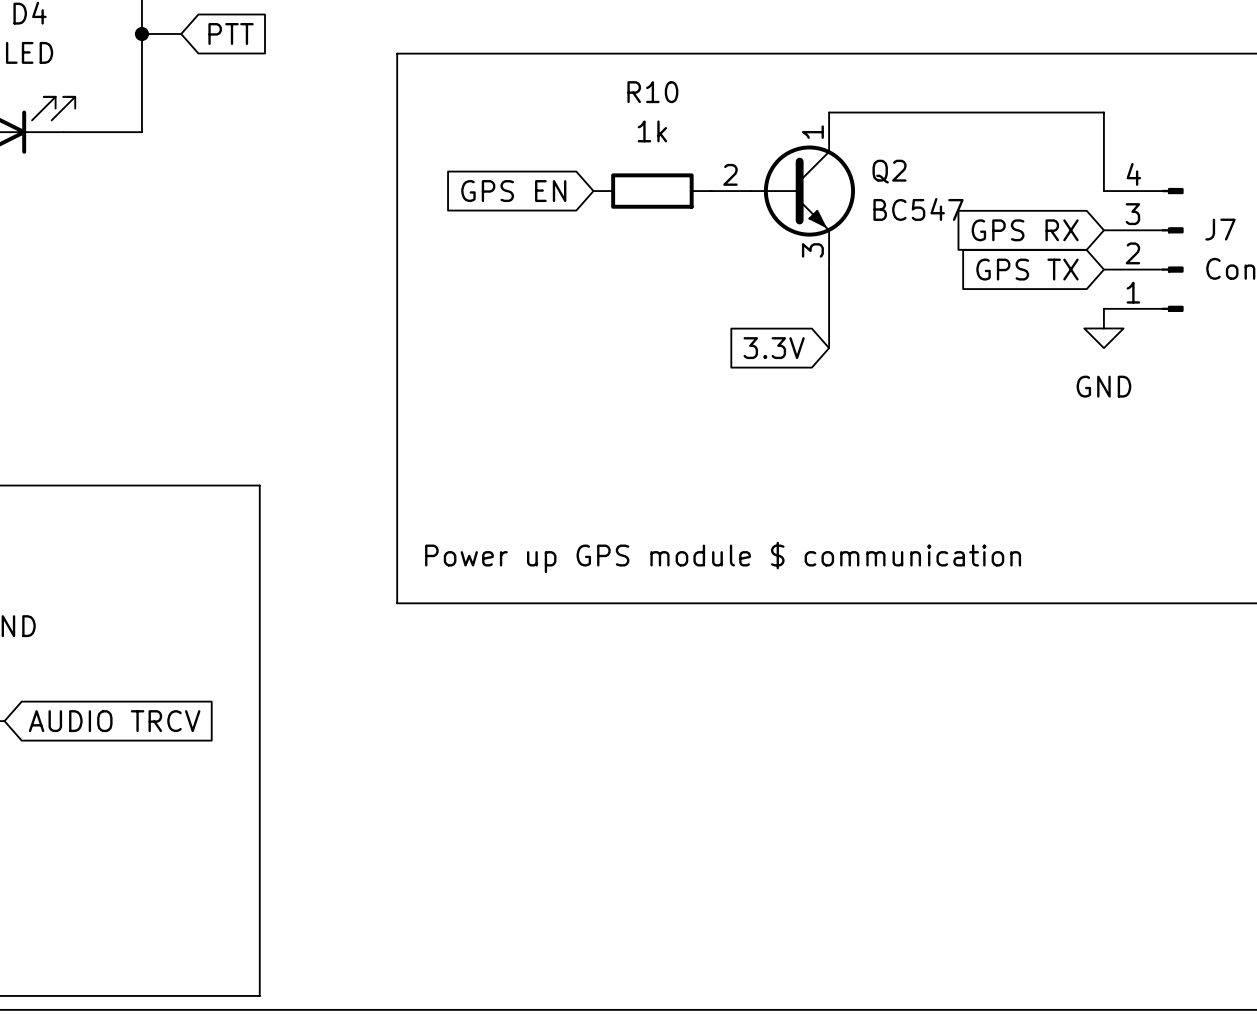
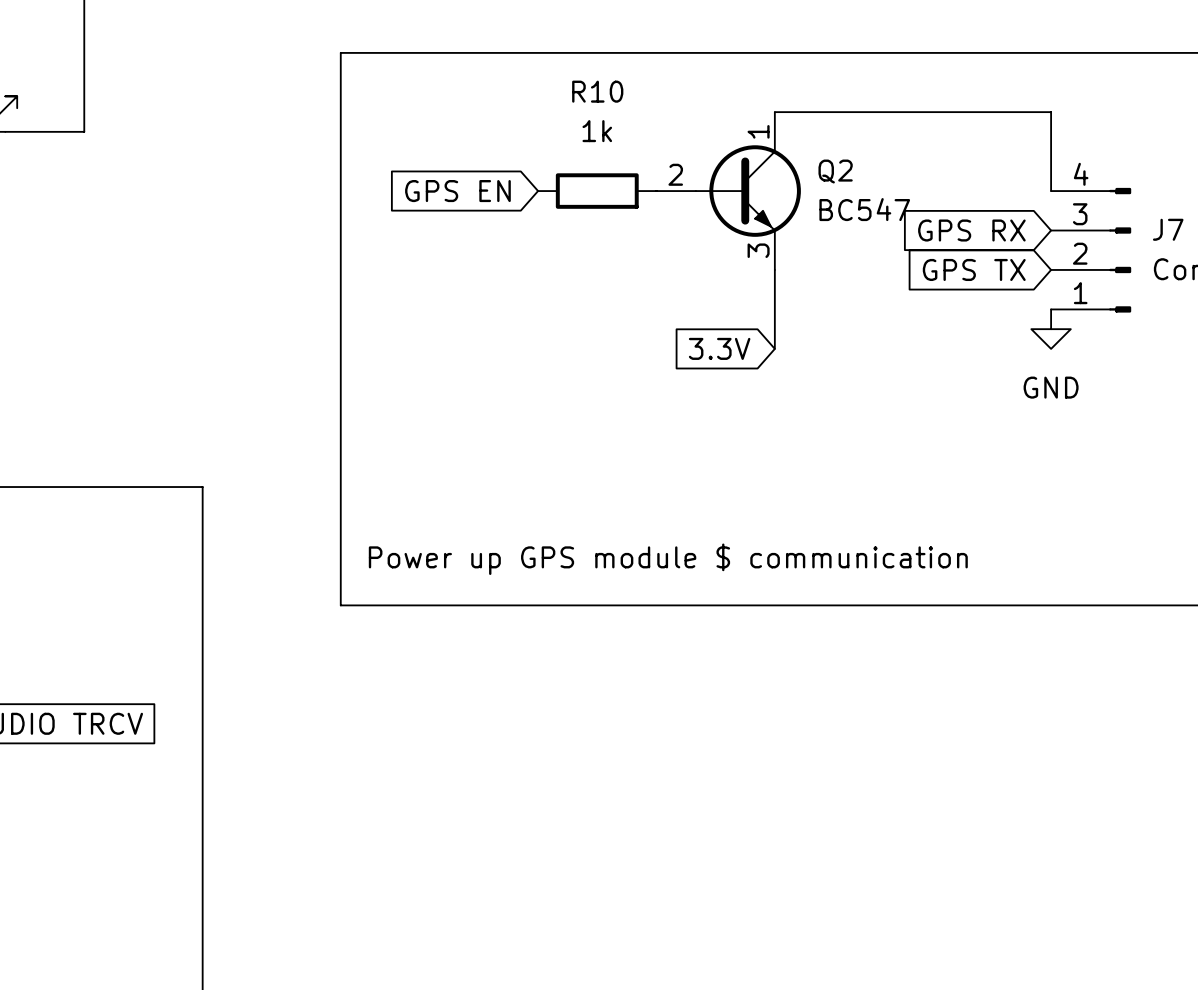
wire: (141, 33) (181, 33) -> none
junction: (141, 33) -> none
global label: PTT (231, 33) -> none

